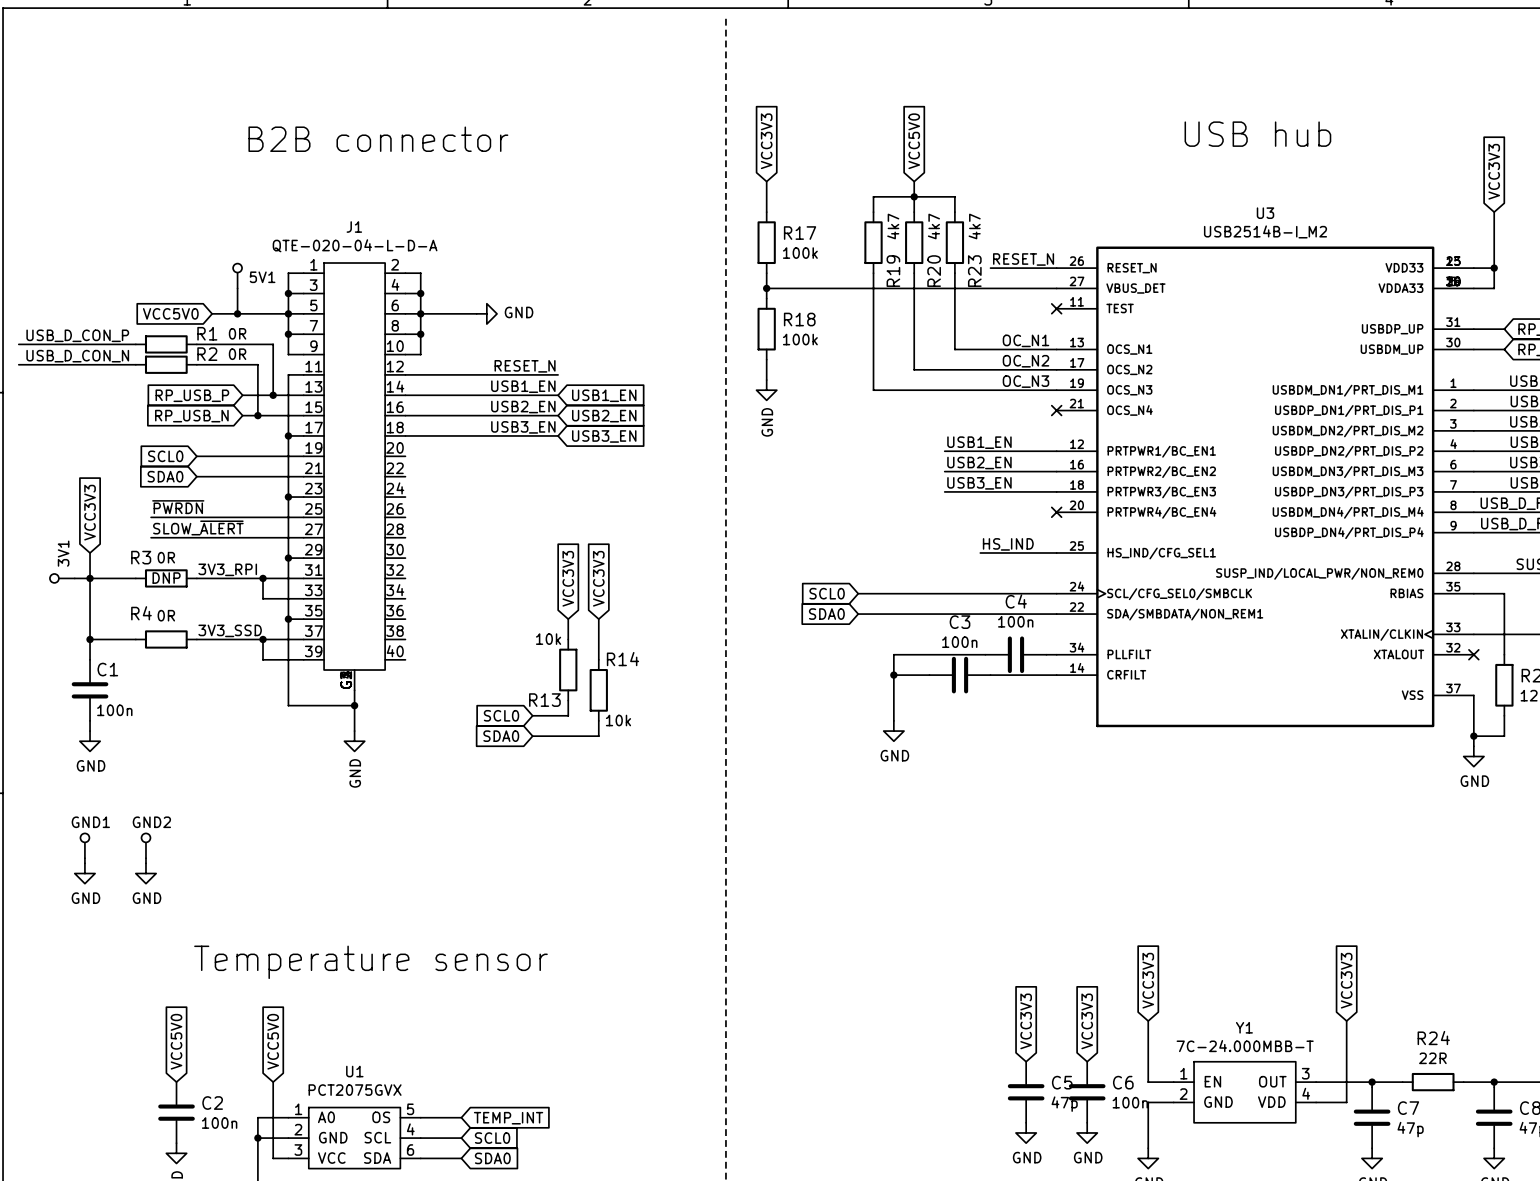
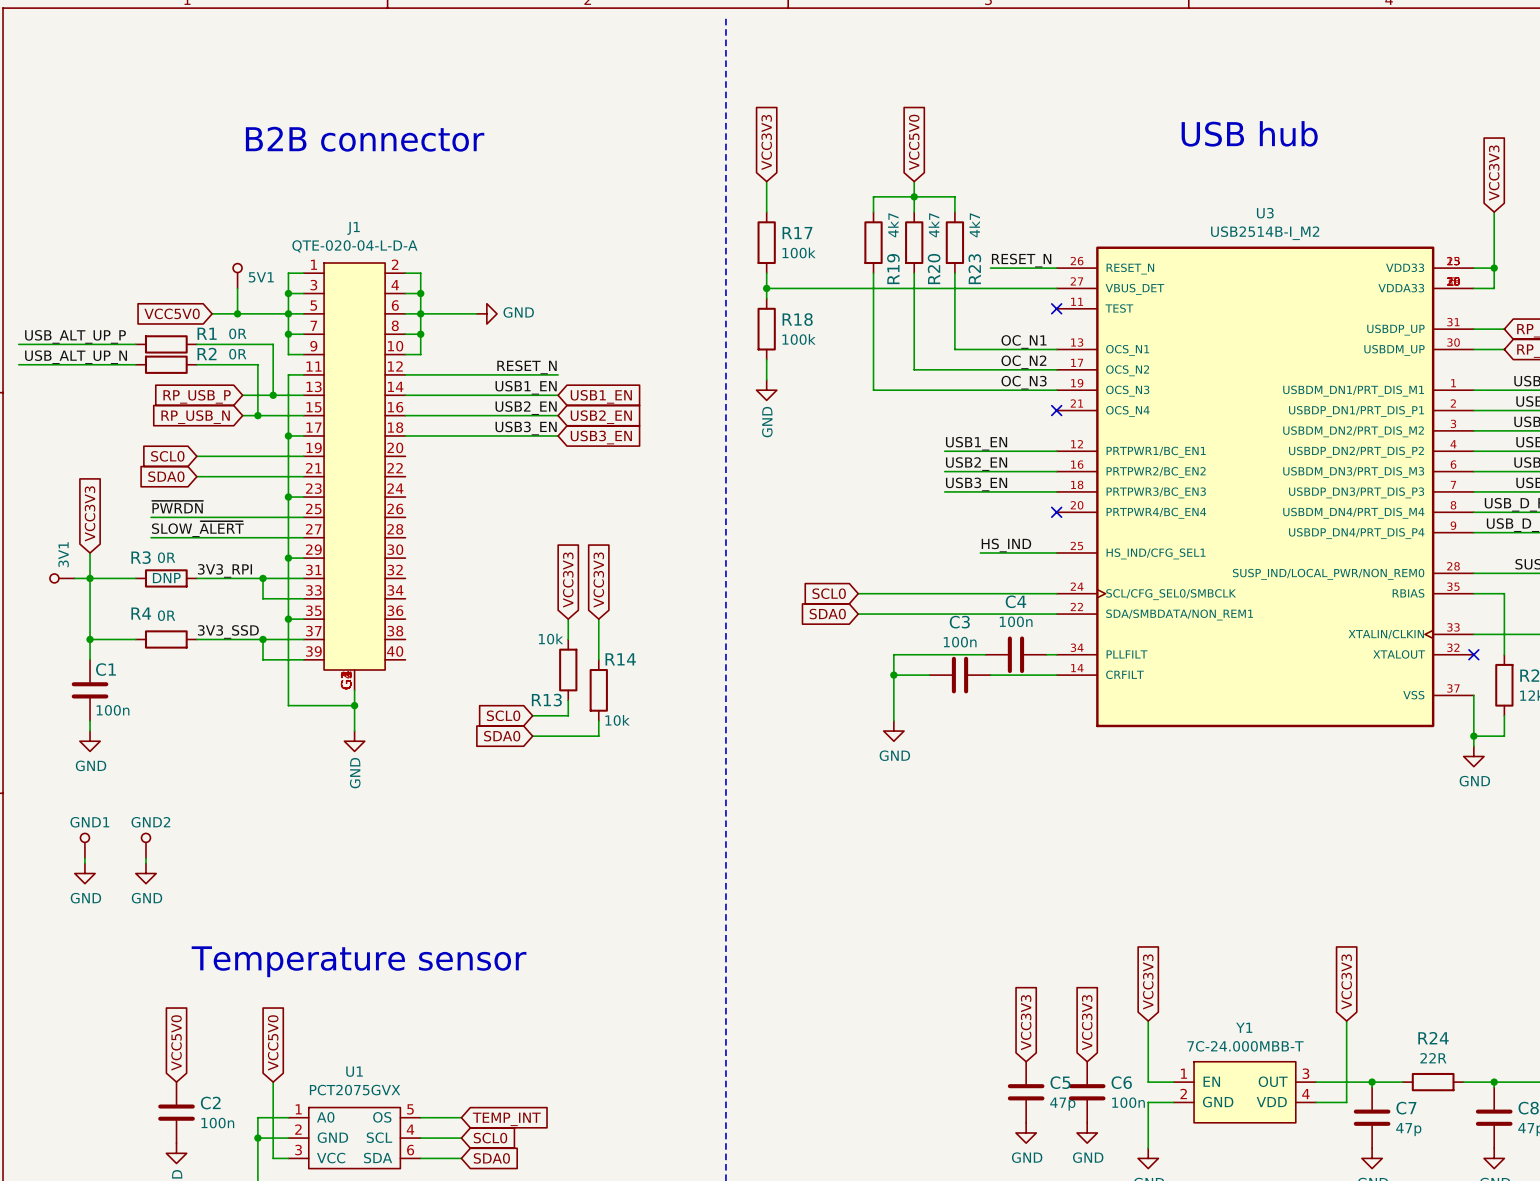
label: USB_D_CON_P (77, 335) -> USB_ALT_UP_P (75, 336)
label: USB_D_CON_N (77, 356) -> USB_ALT_UP_N (76, 357)

